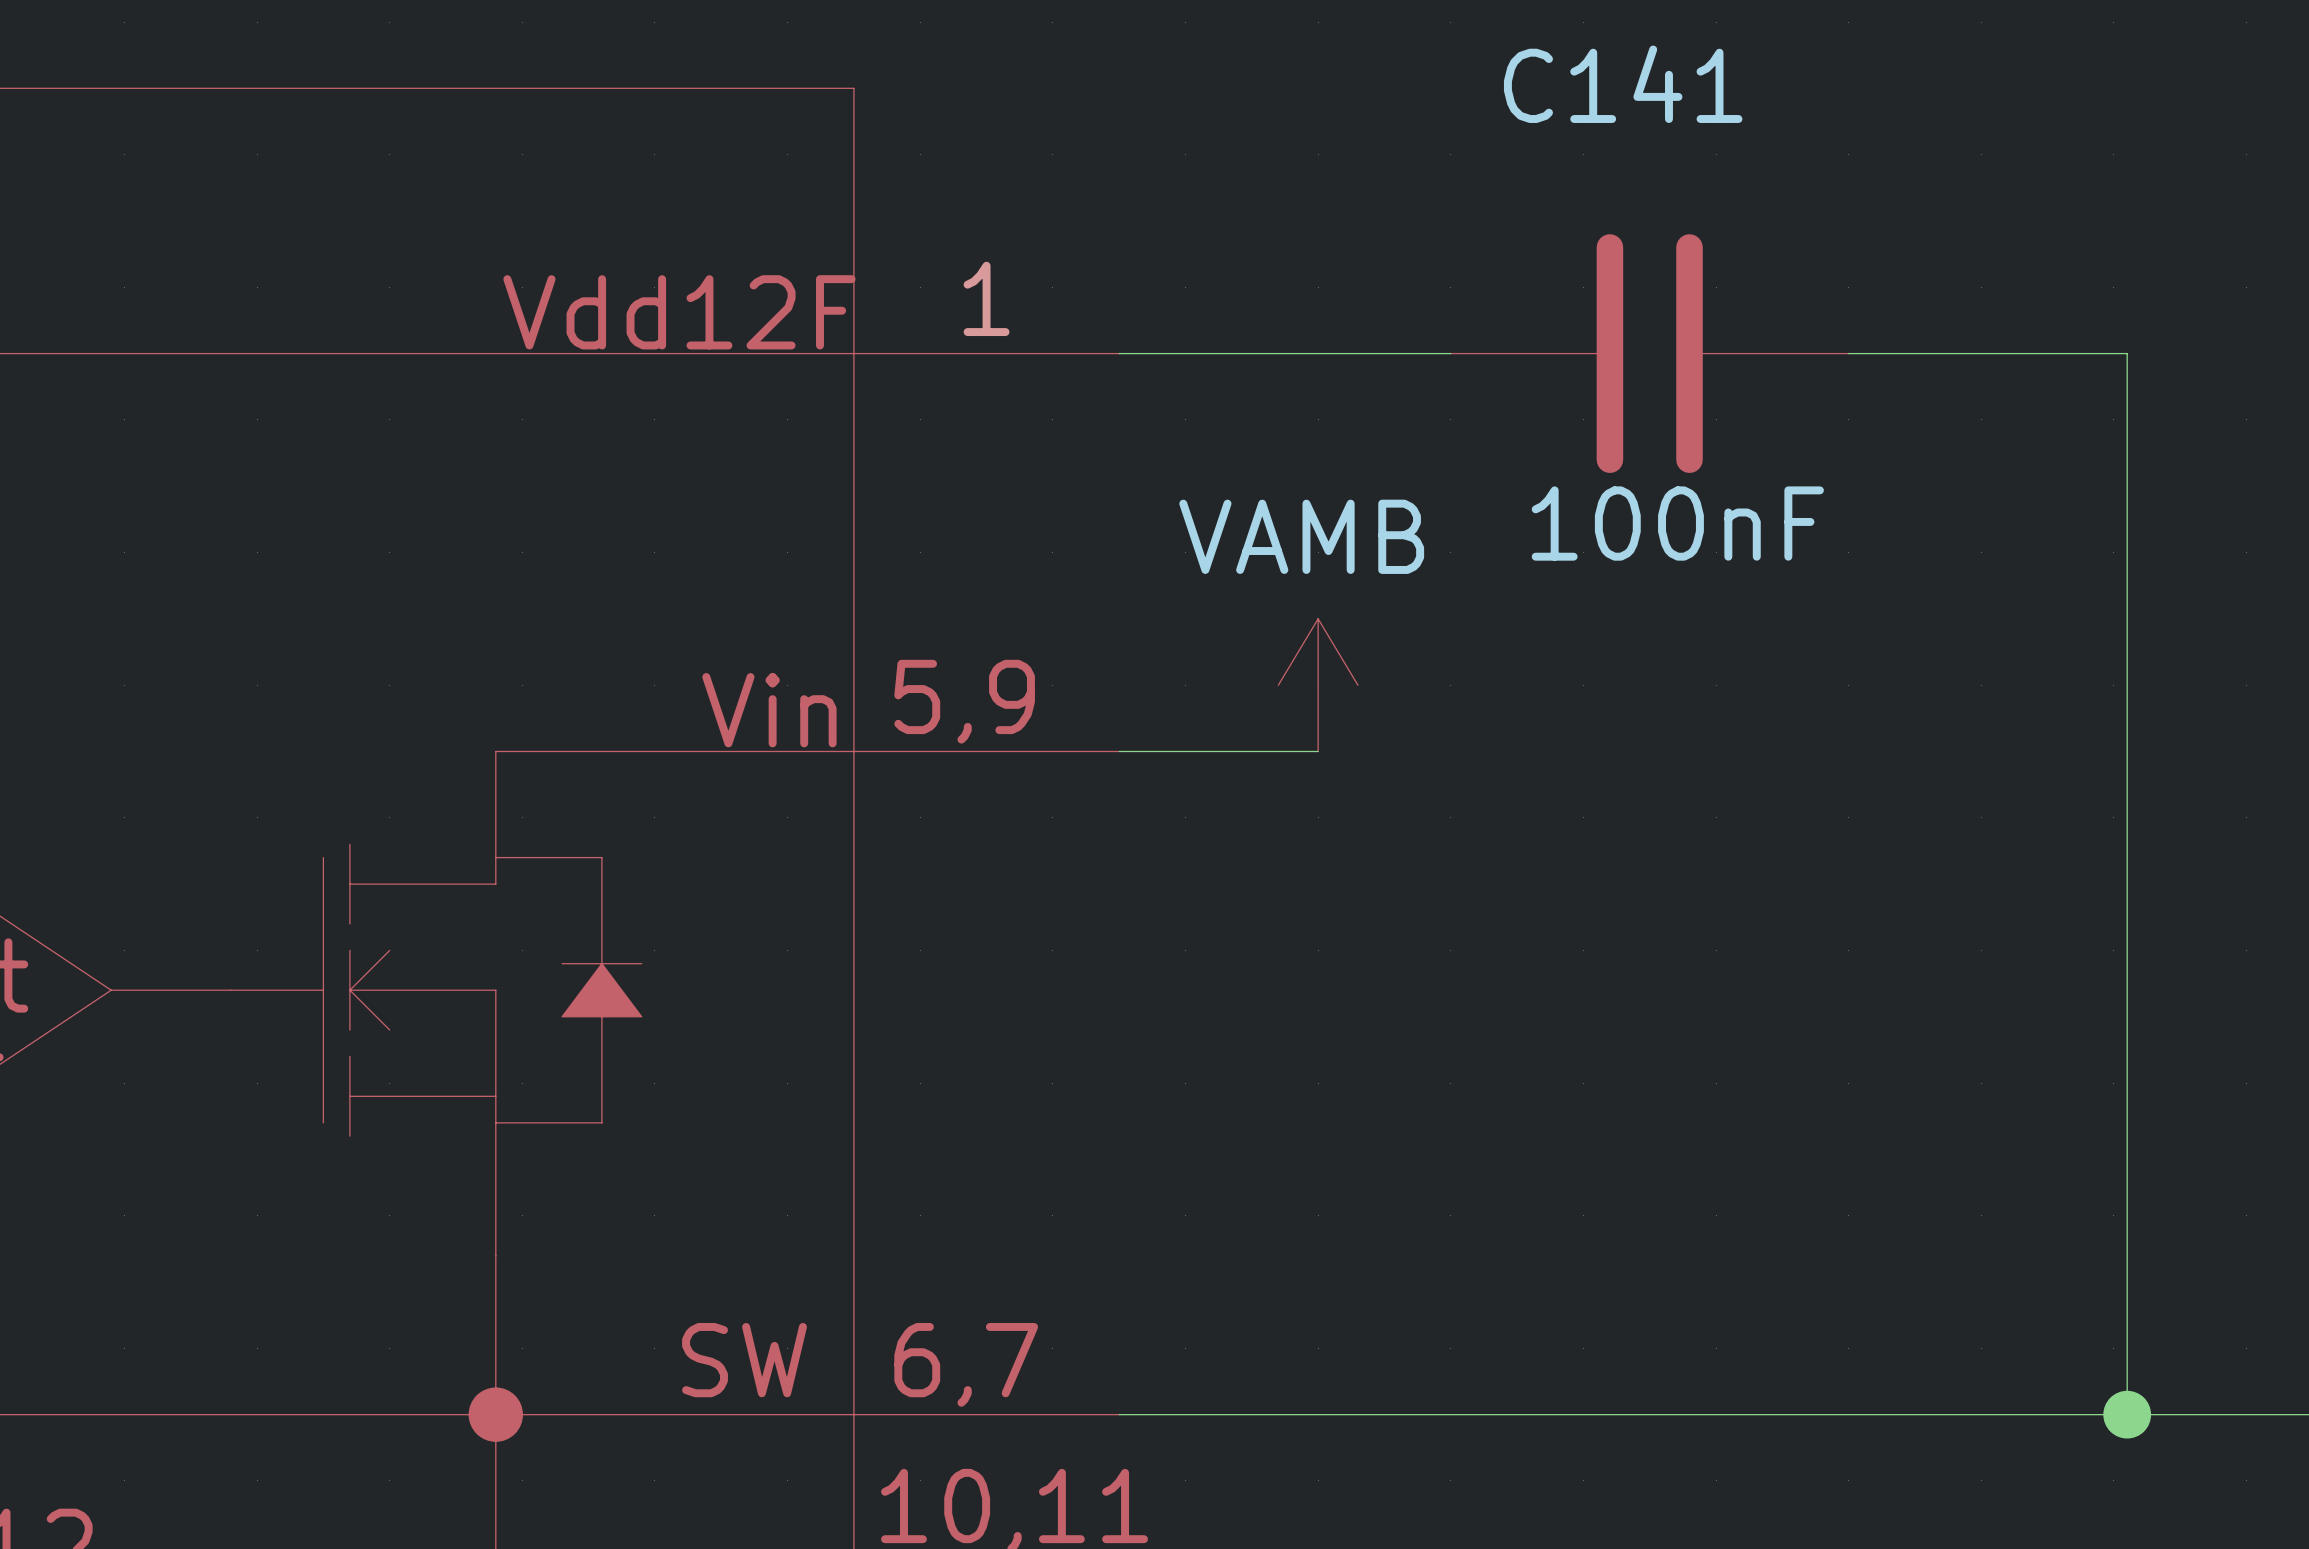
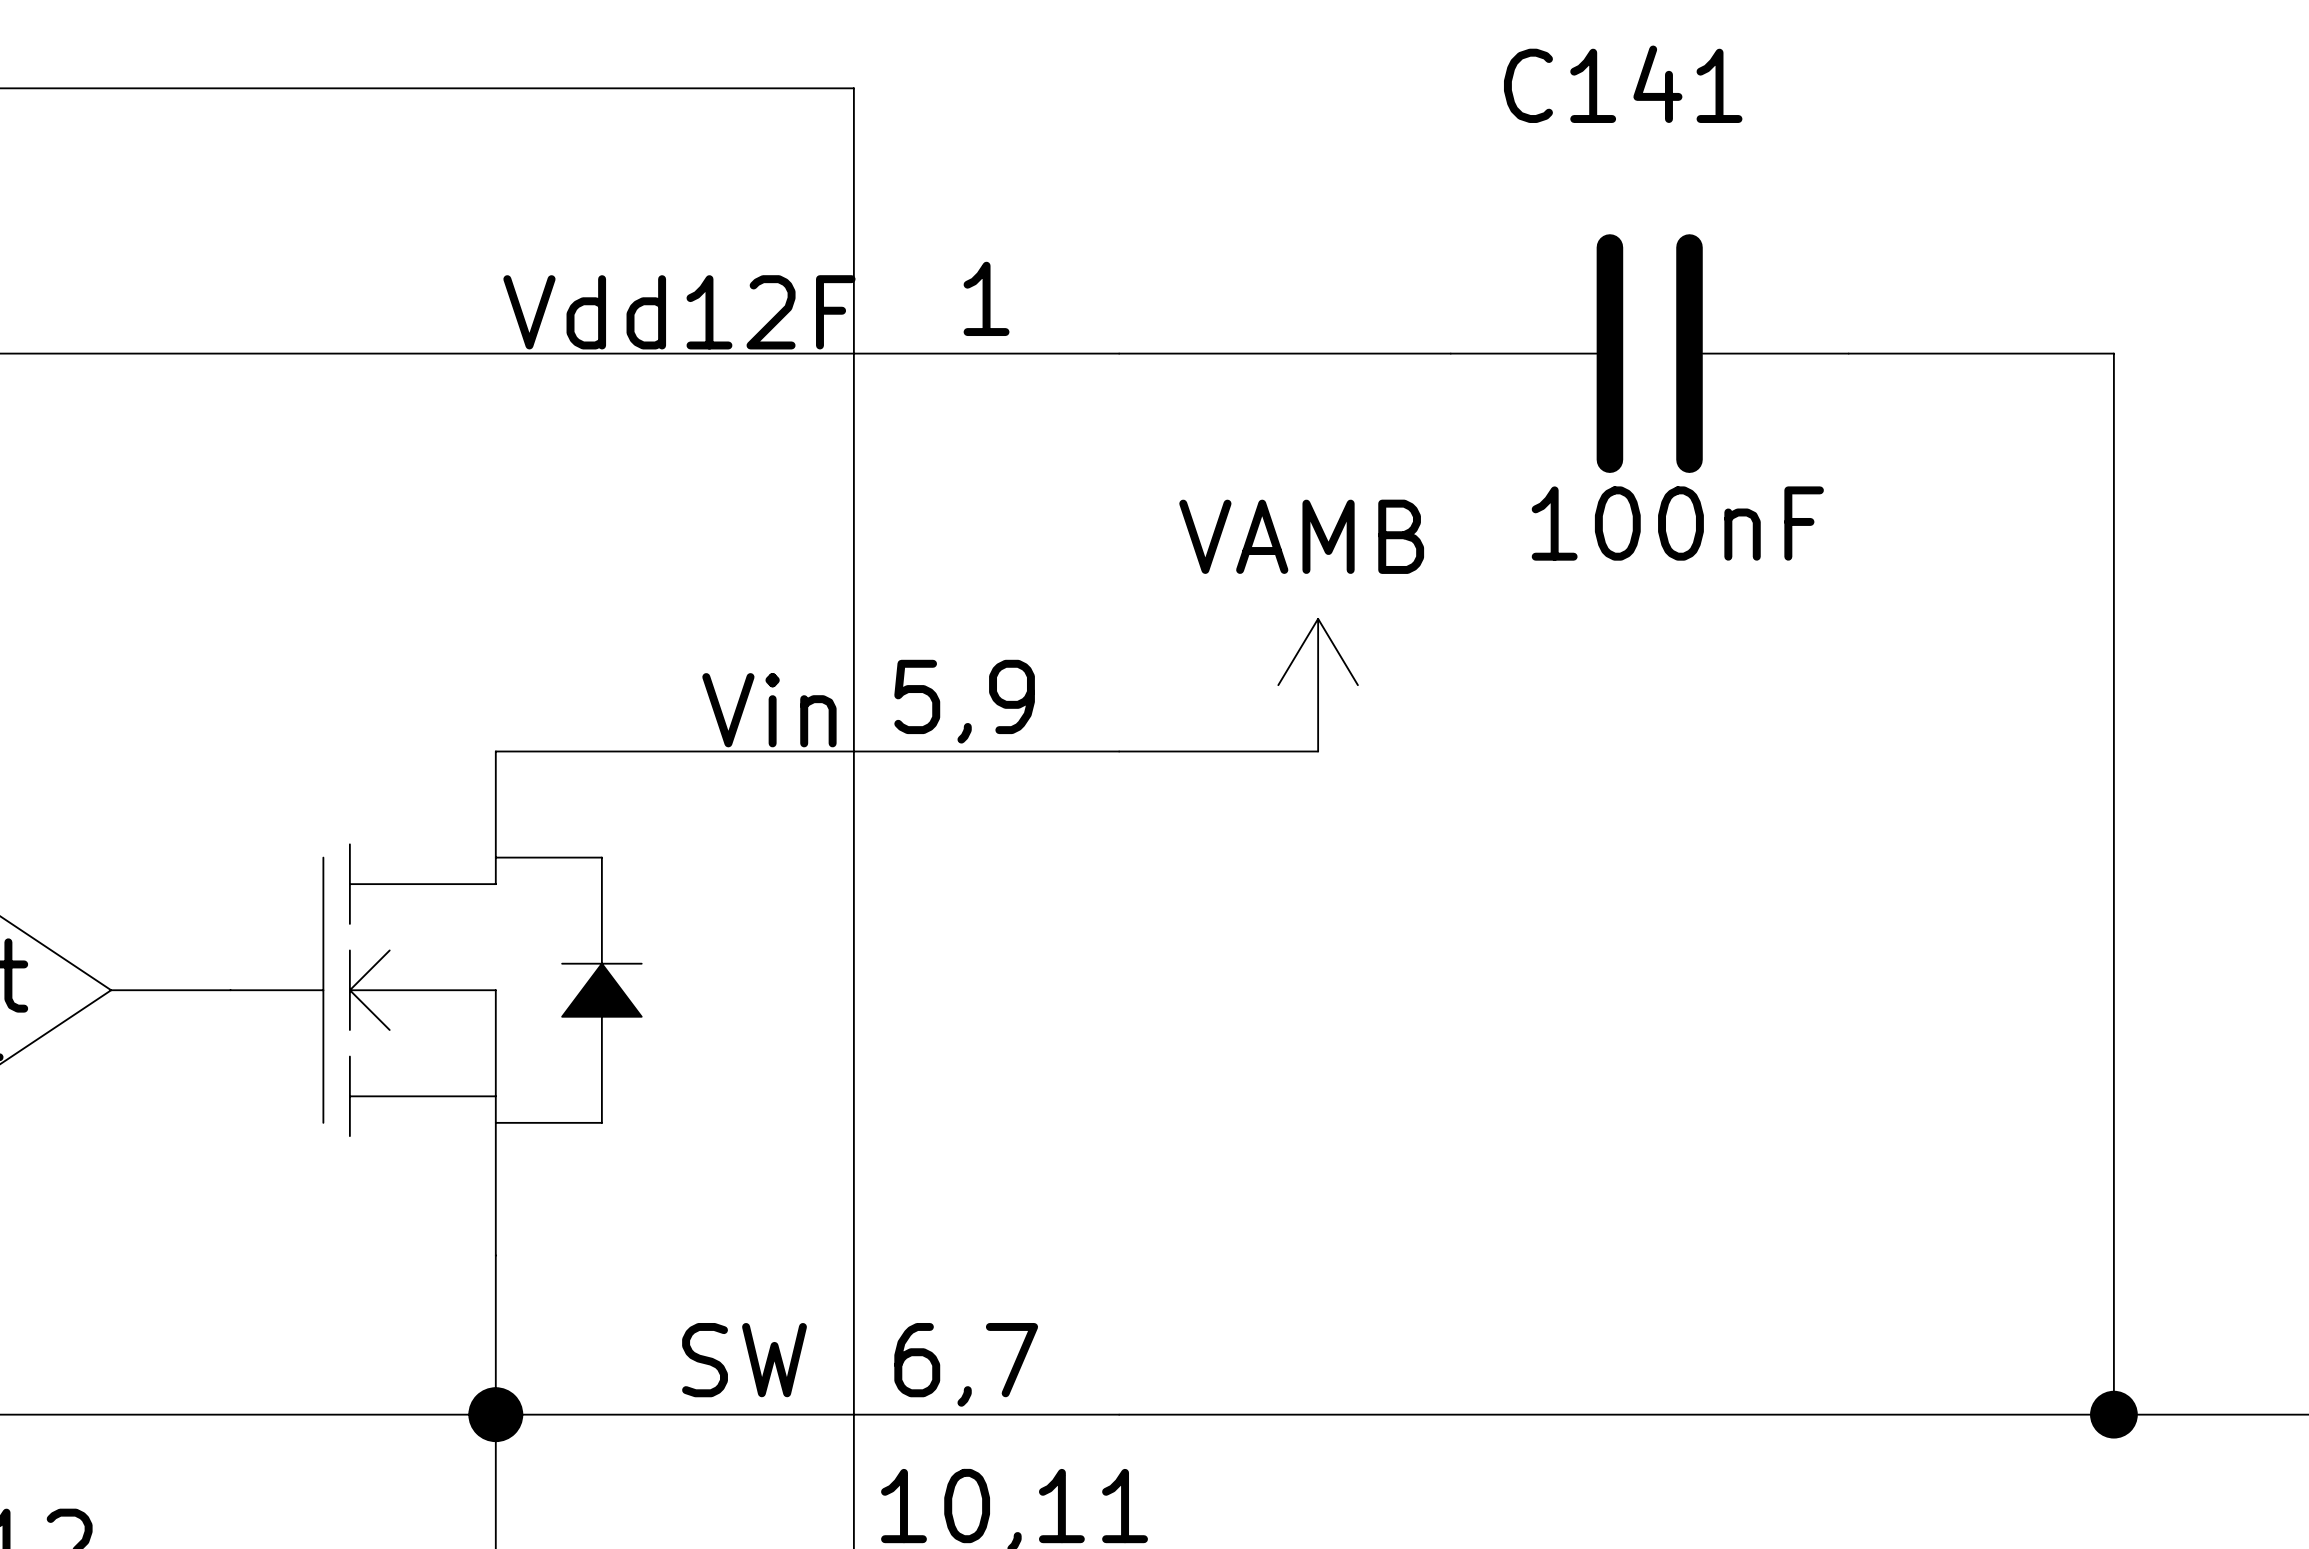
wire: (2113, 353) (2127, 353) (2127, 1414) -> (2113, 353) (2113, 1414)
junction position: (2127, 1414) -> (2113, 1414)

